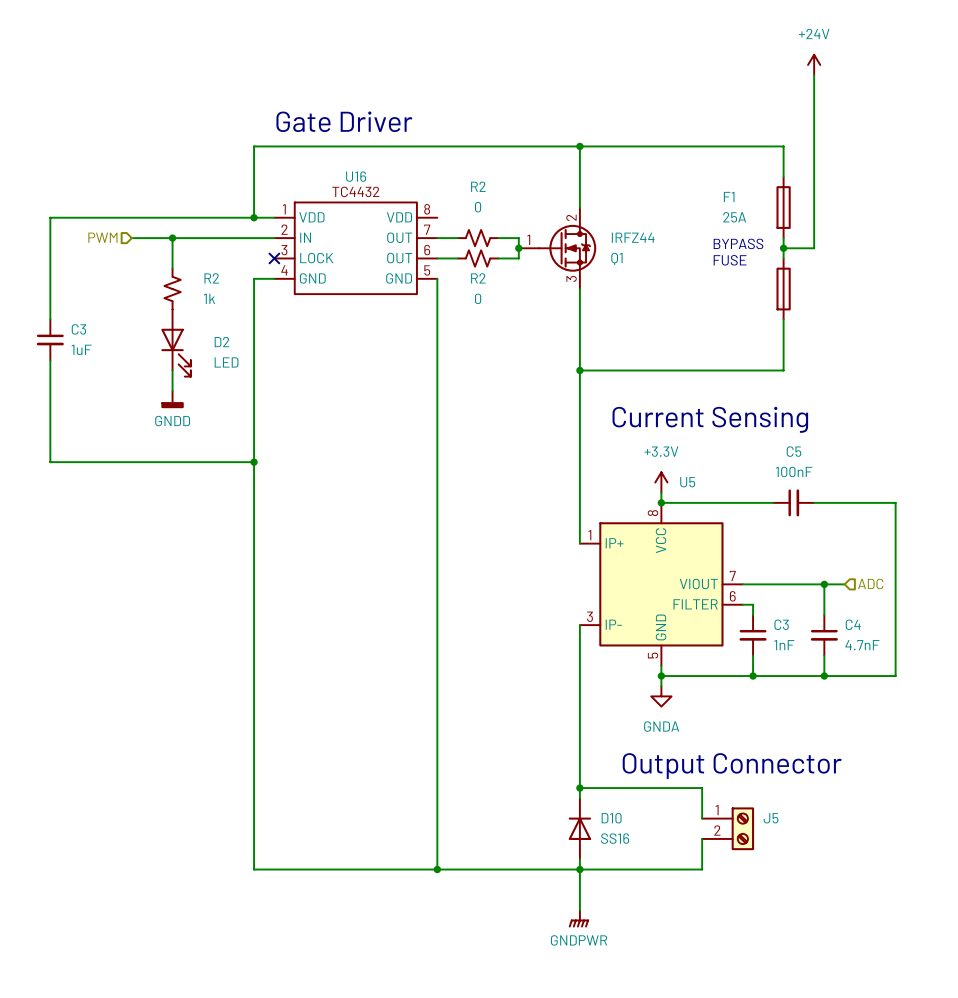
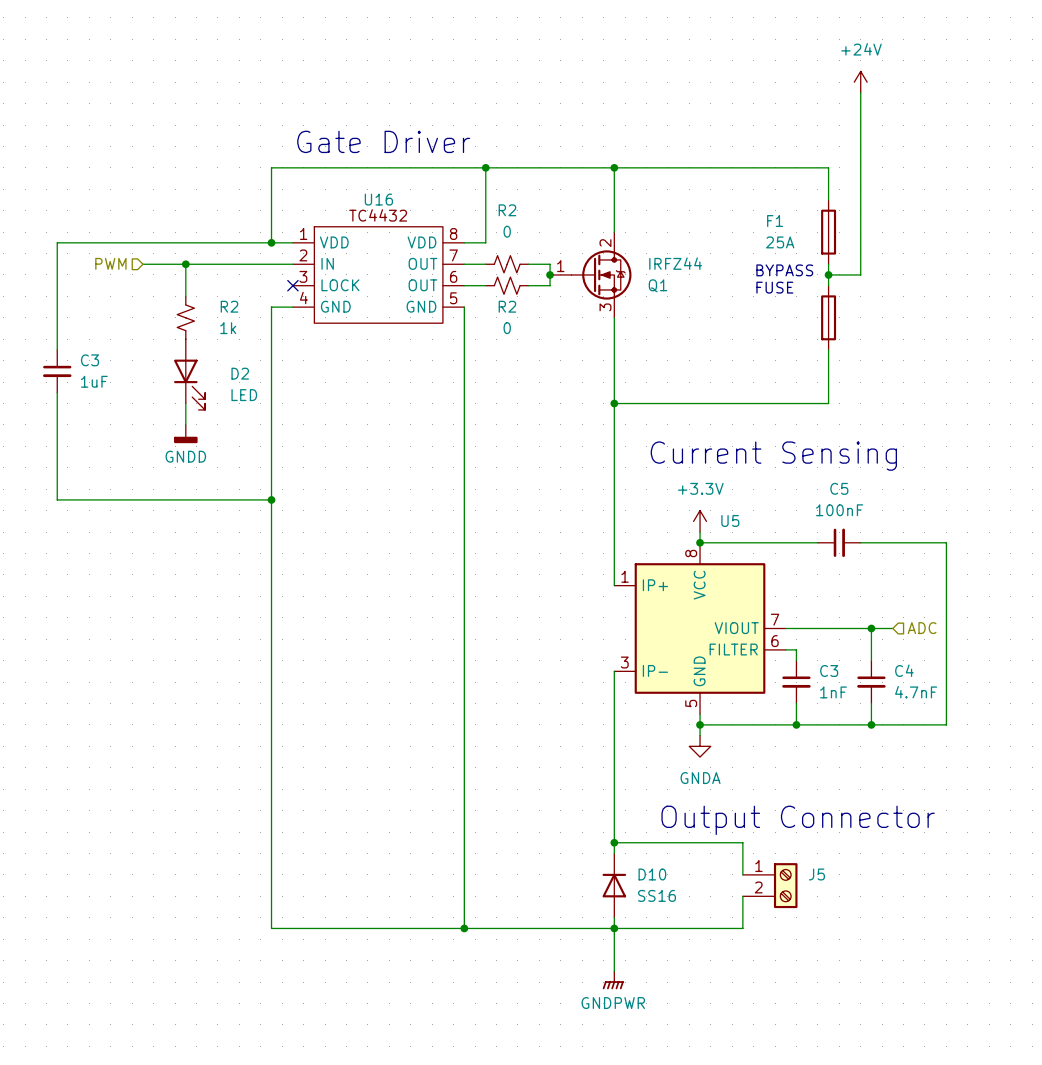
wire: none -> (485, 167) (485, 242) (464, 242)
junction: none -> (485, 167)

